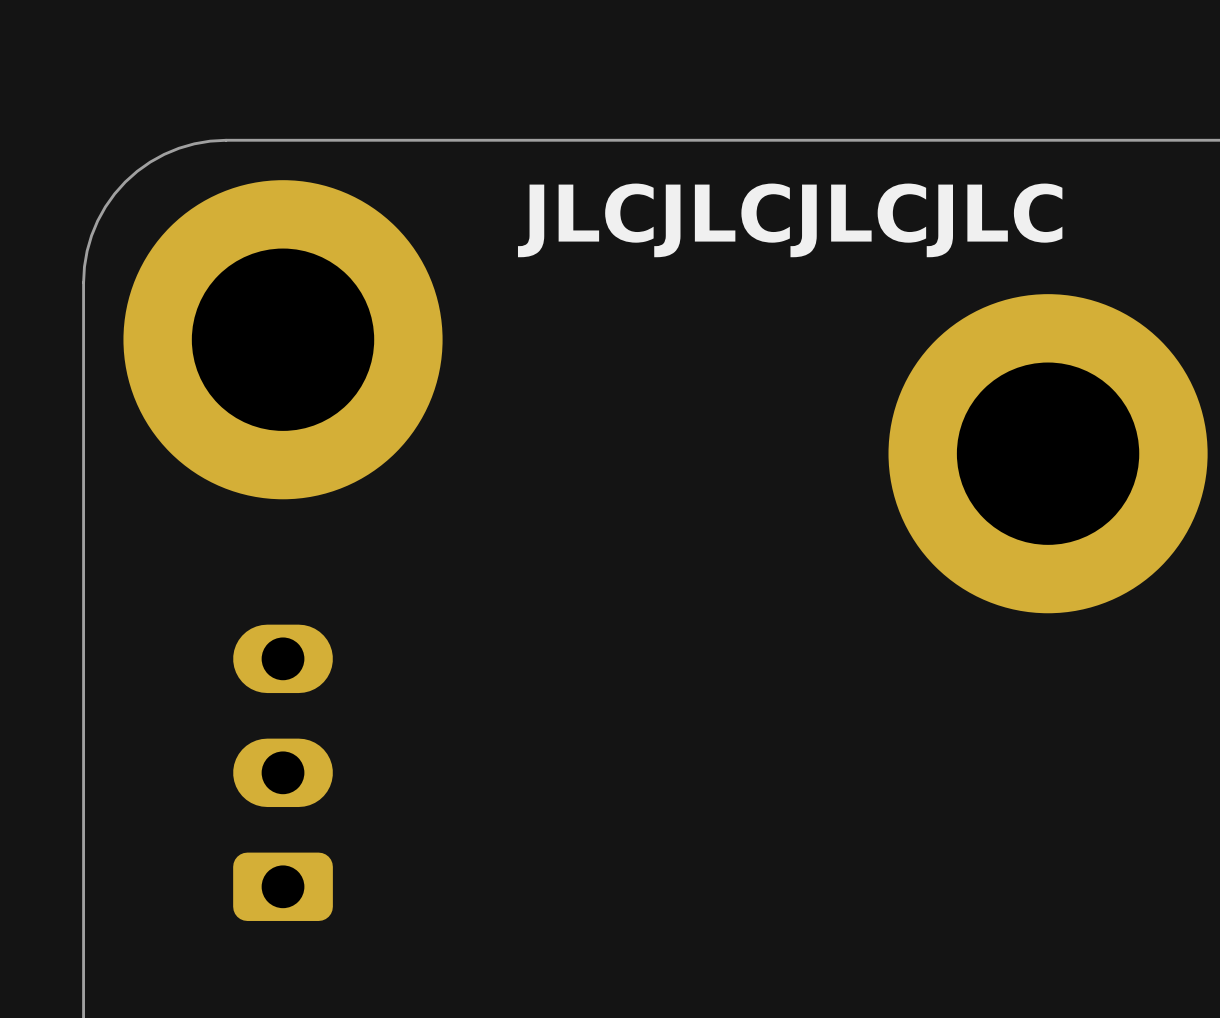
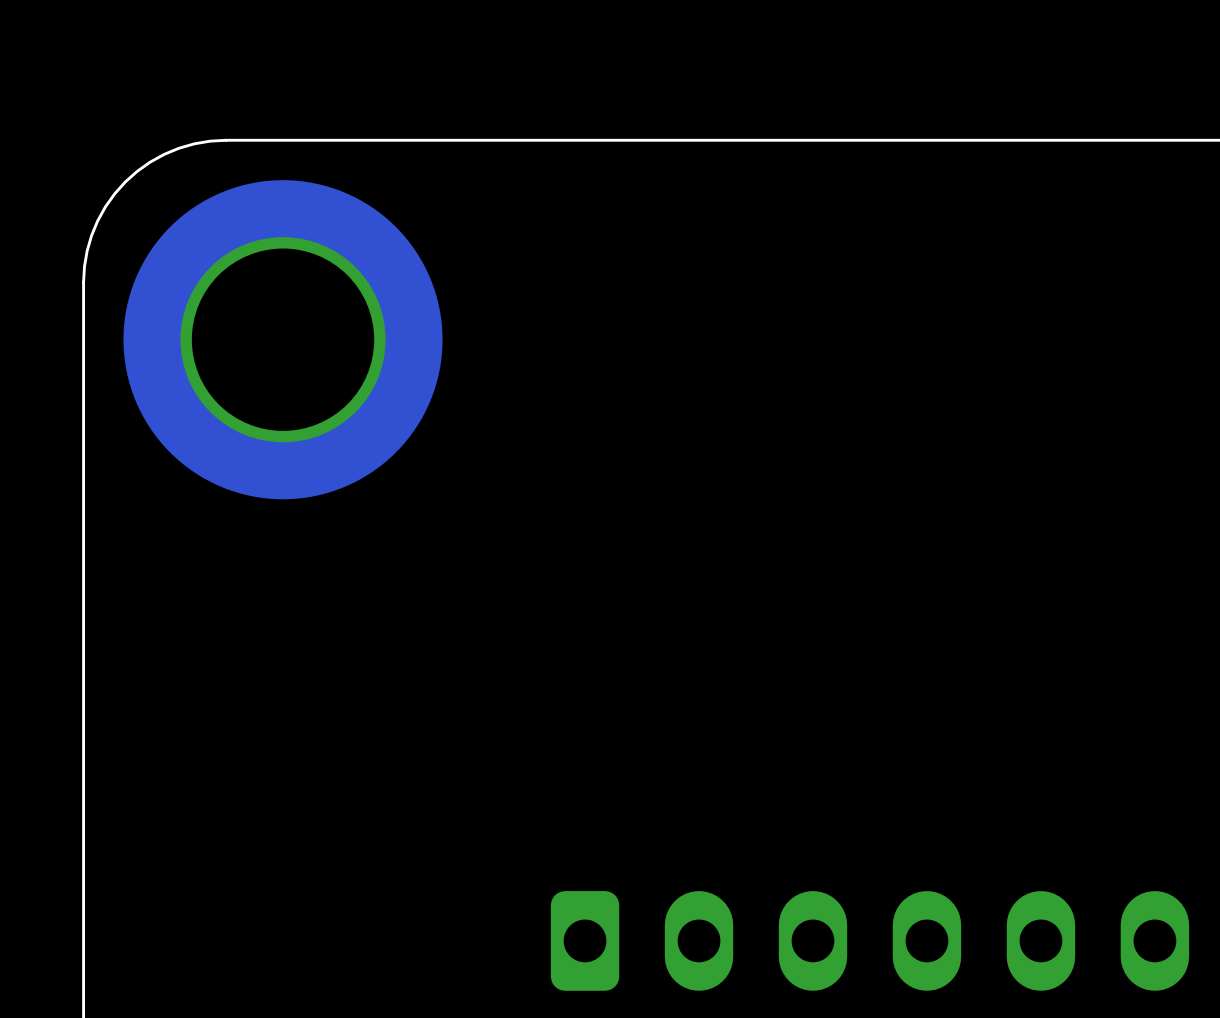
text: JLCJLCJLCJLC (790, 220) -> none
part: (1048, 453) -> none
part: (283, 772) -> none
part: none -> (869, 940)

